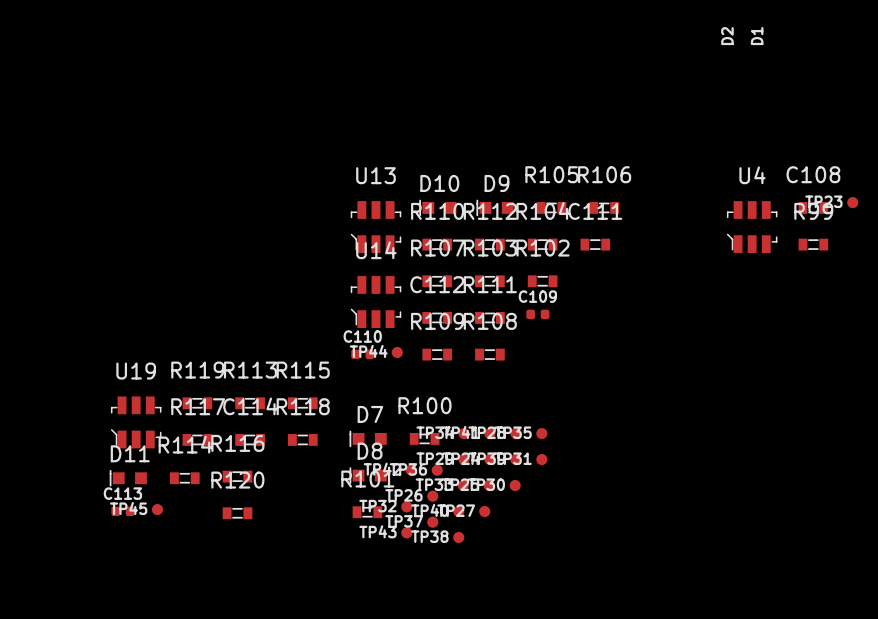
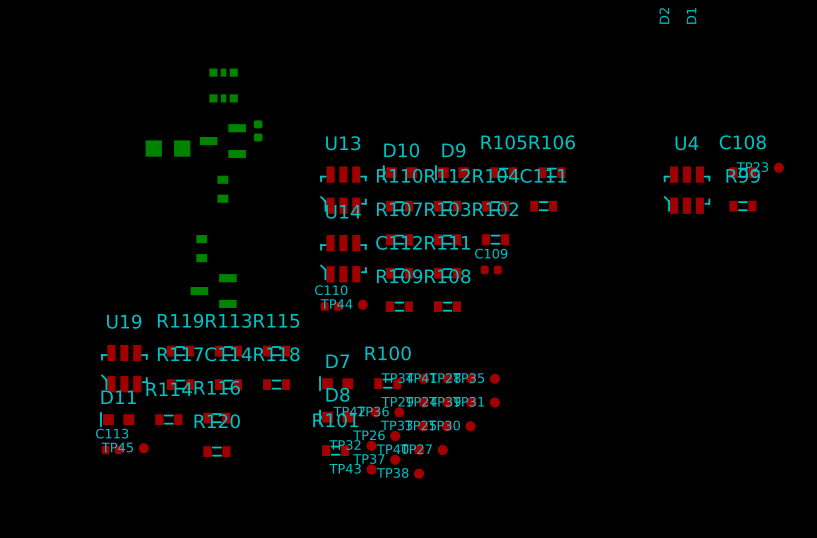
part: none -> (223, 85)
part: none -> (258, 130)
part: none -> (222, 141)
part: none -> (167, 148)
part: none -> (222, 189)
part: none -> (201, 248)
part: none -> (213, 291)

